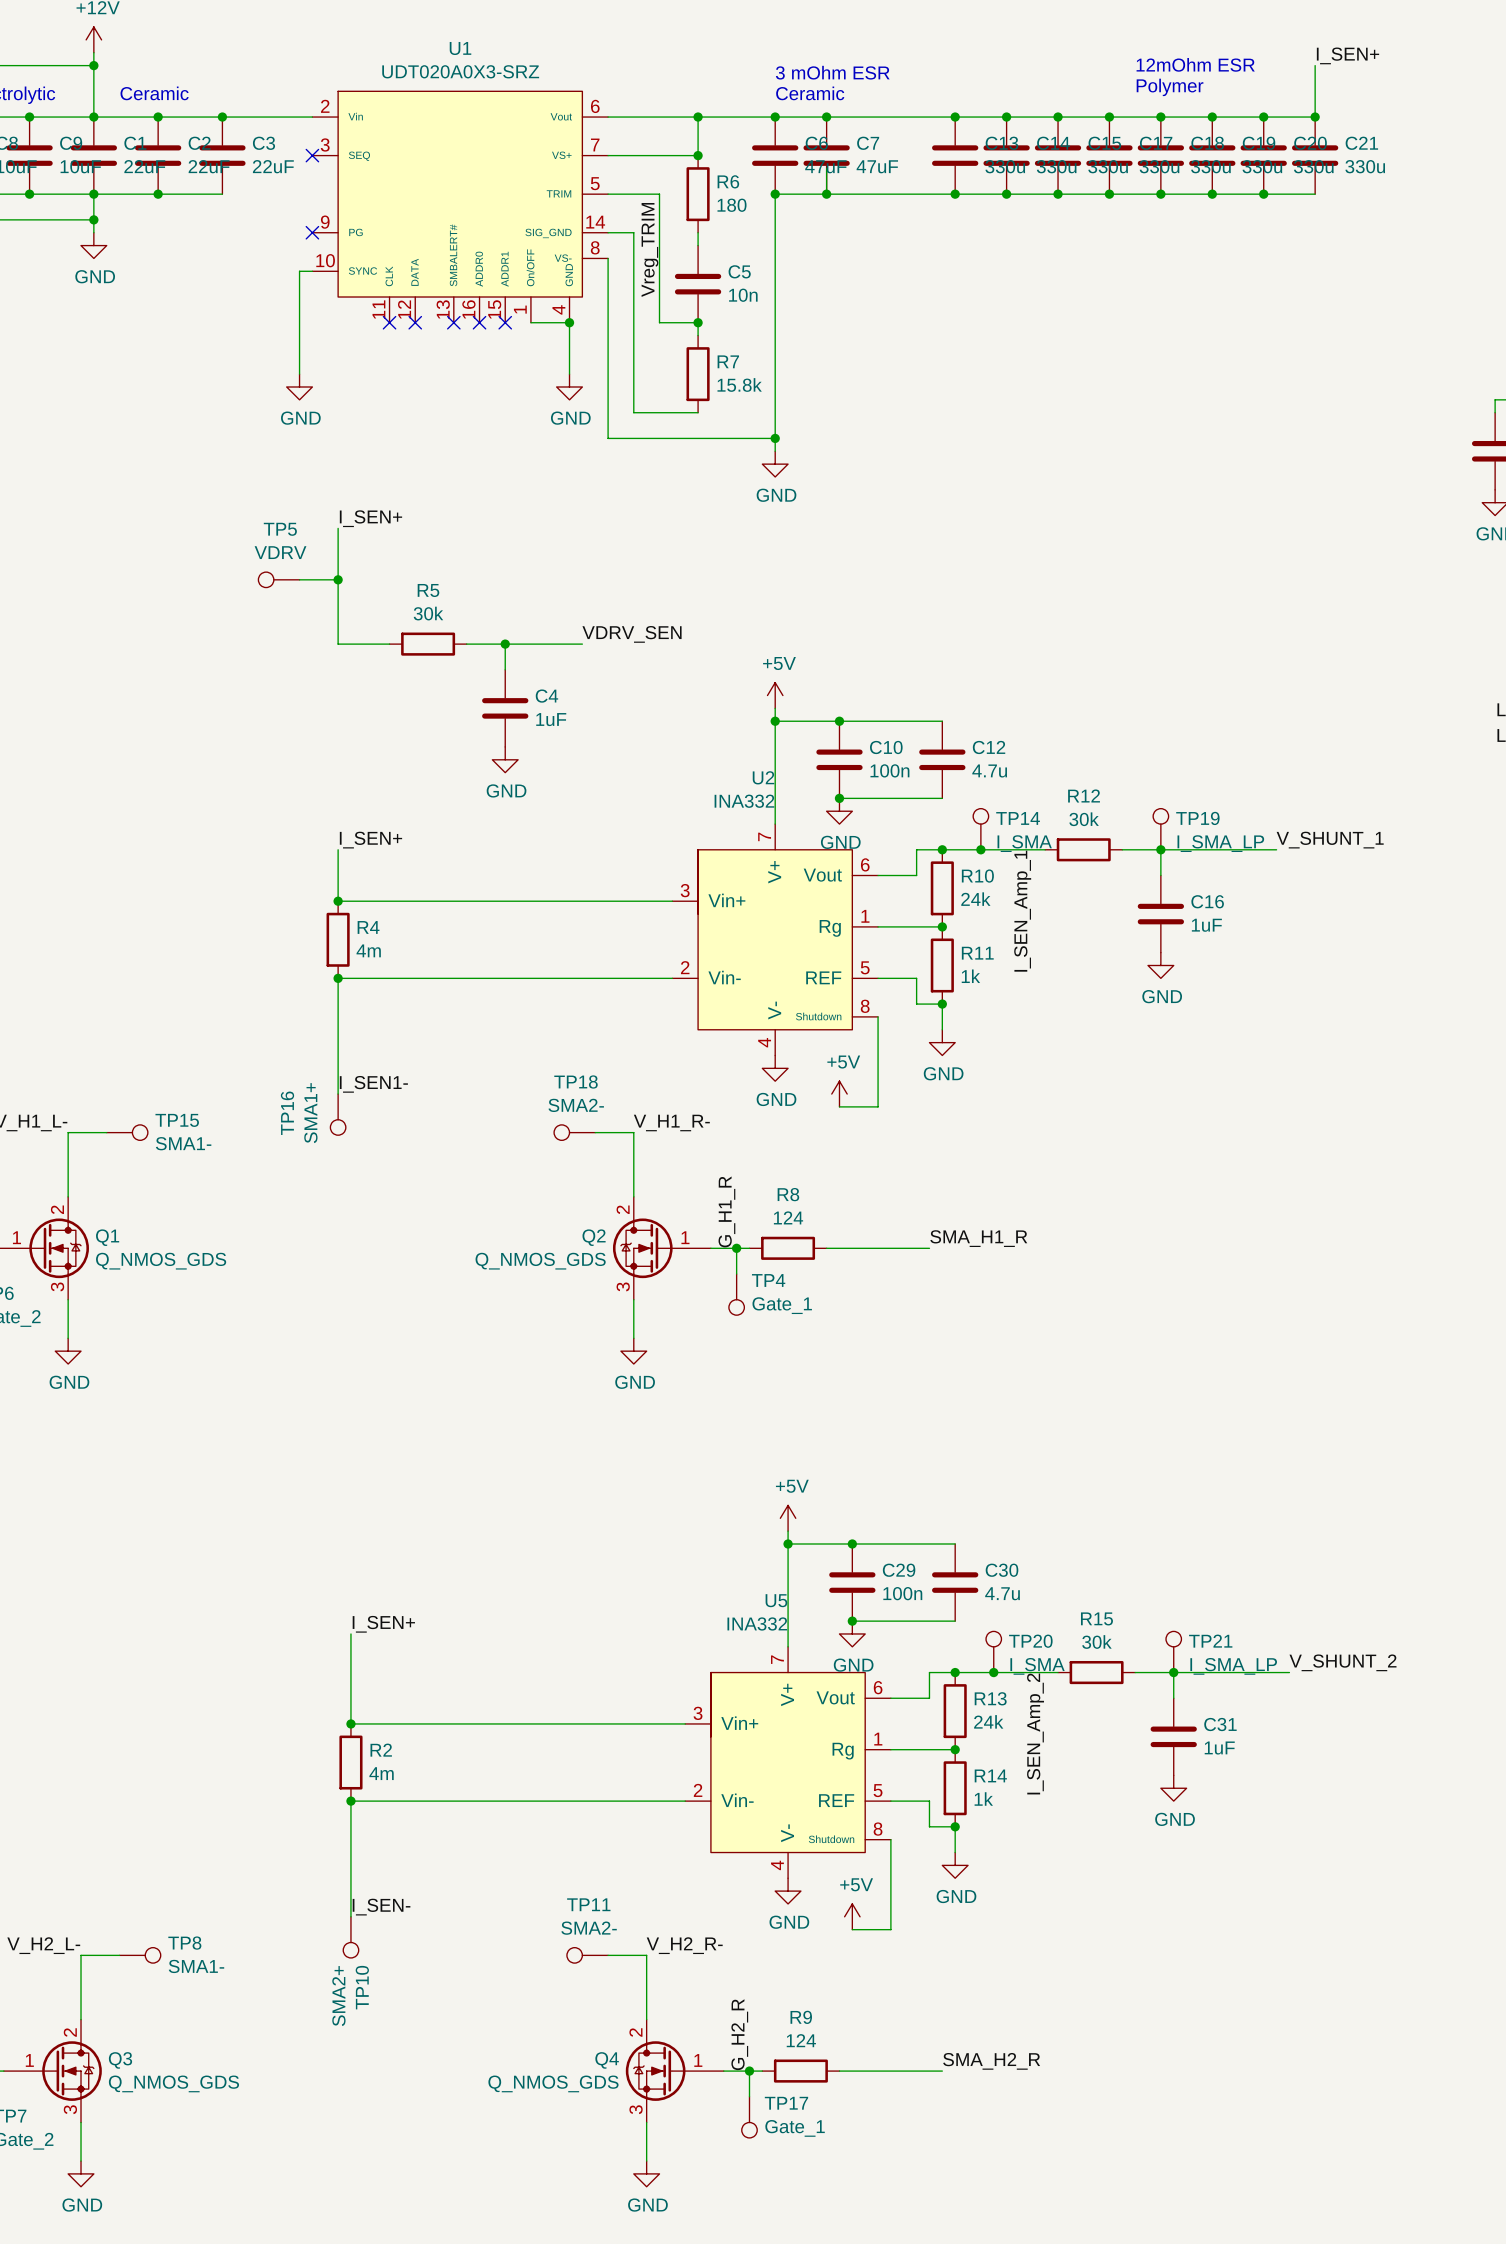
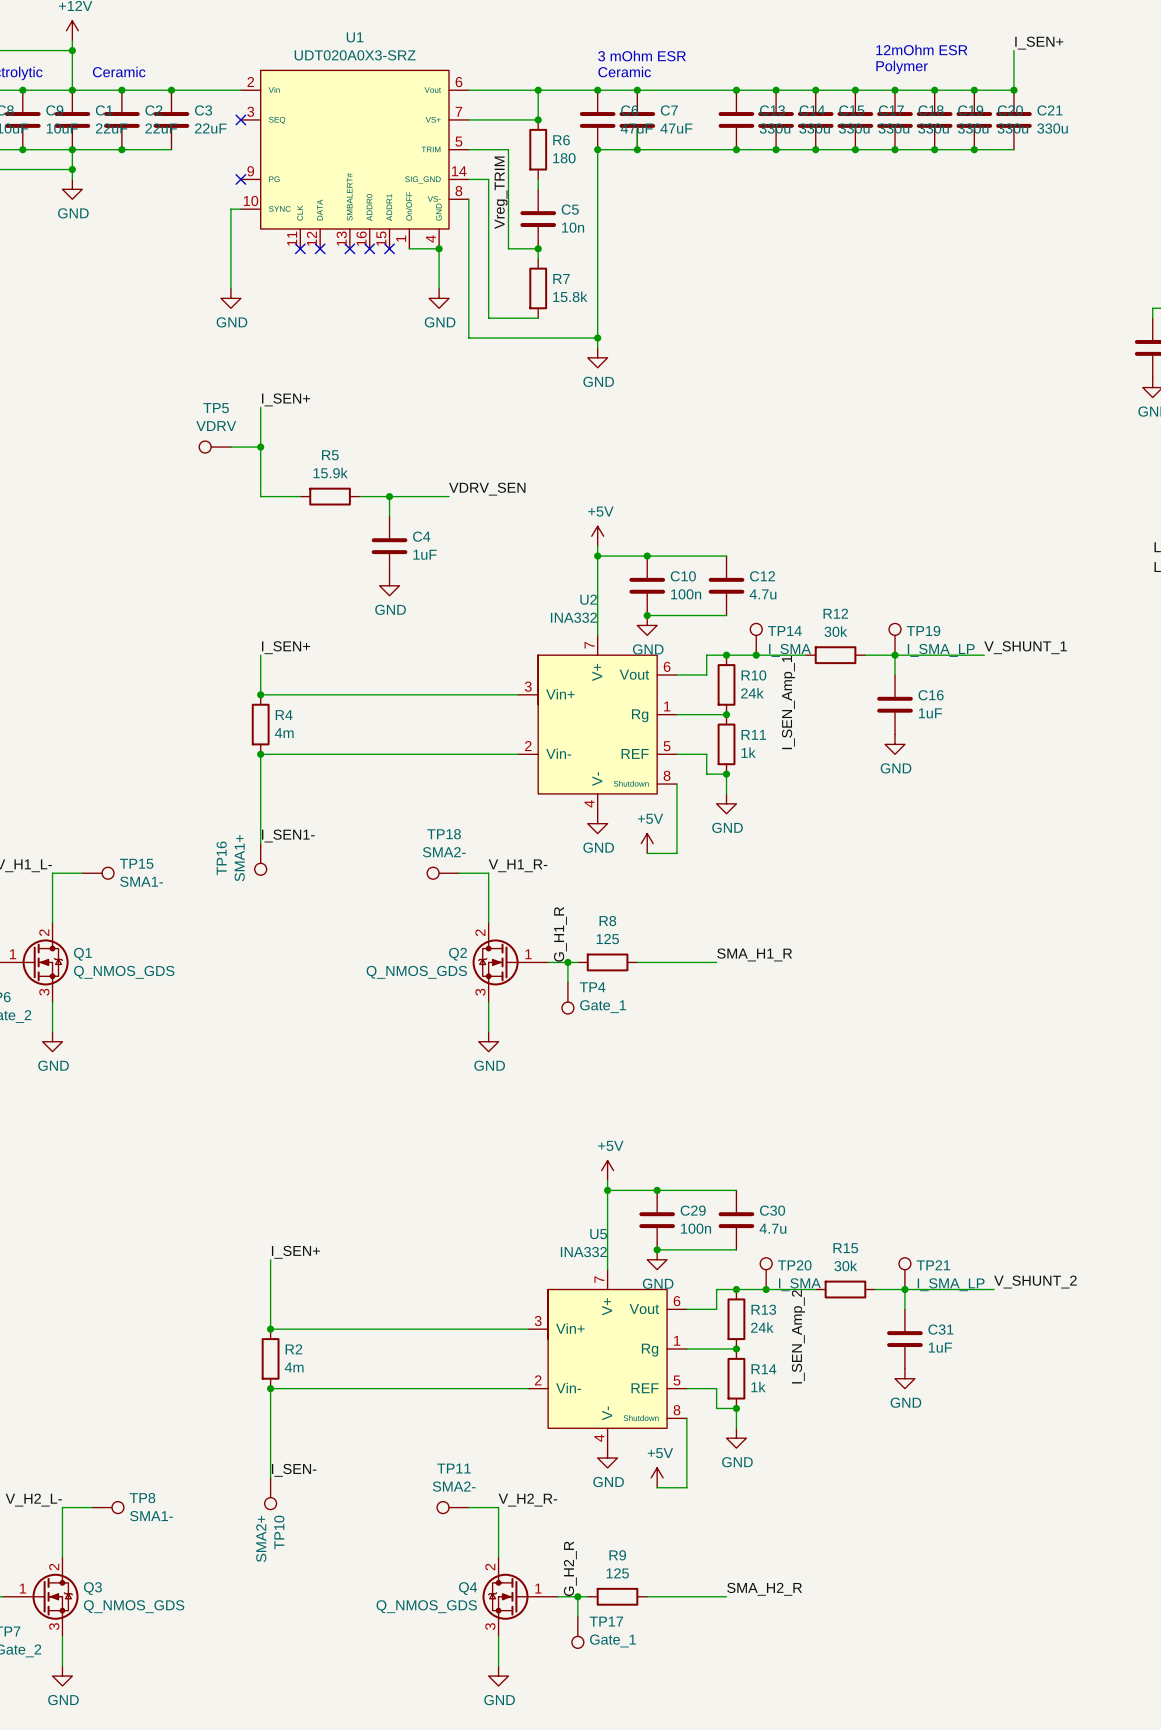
R5 value: 30k (428, 613) -> 15.9k (330, 473)
R8 value: 124 (788, 1217) -> 125 (607, 939)
R9 value: 124 (801, 2040) -> 125 (617, 1573)

